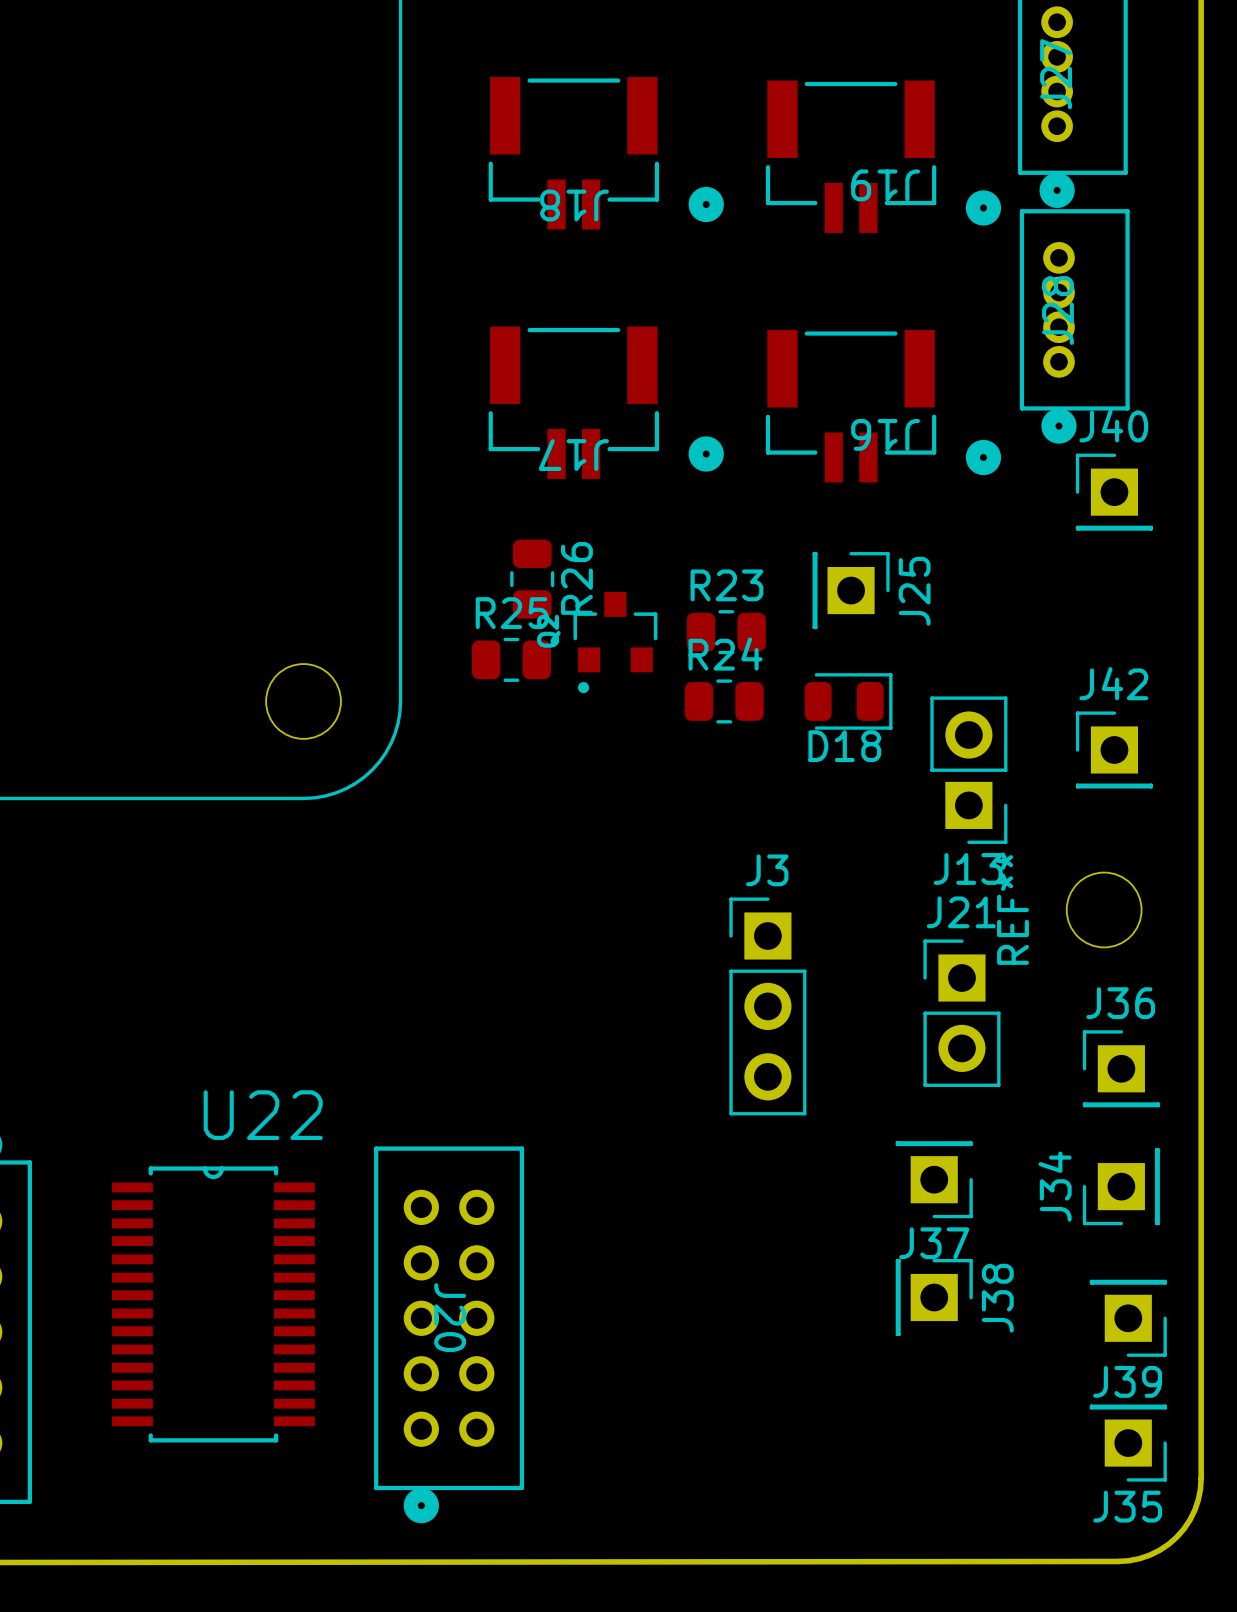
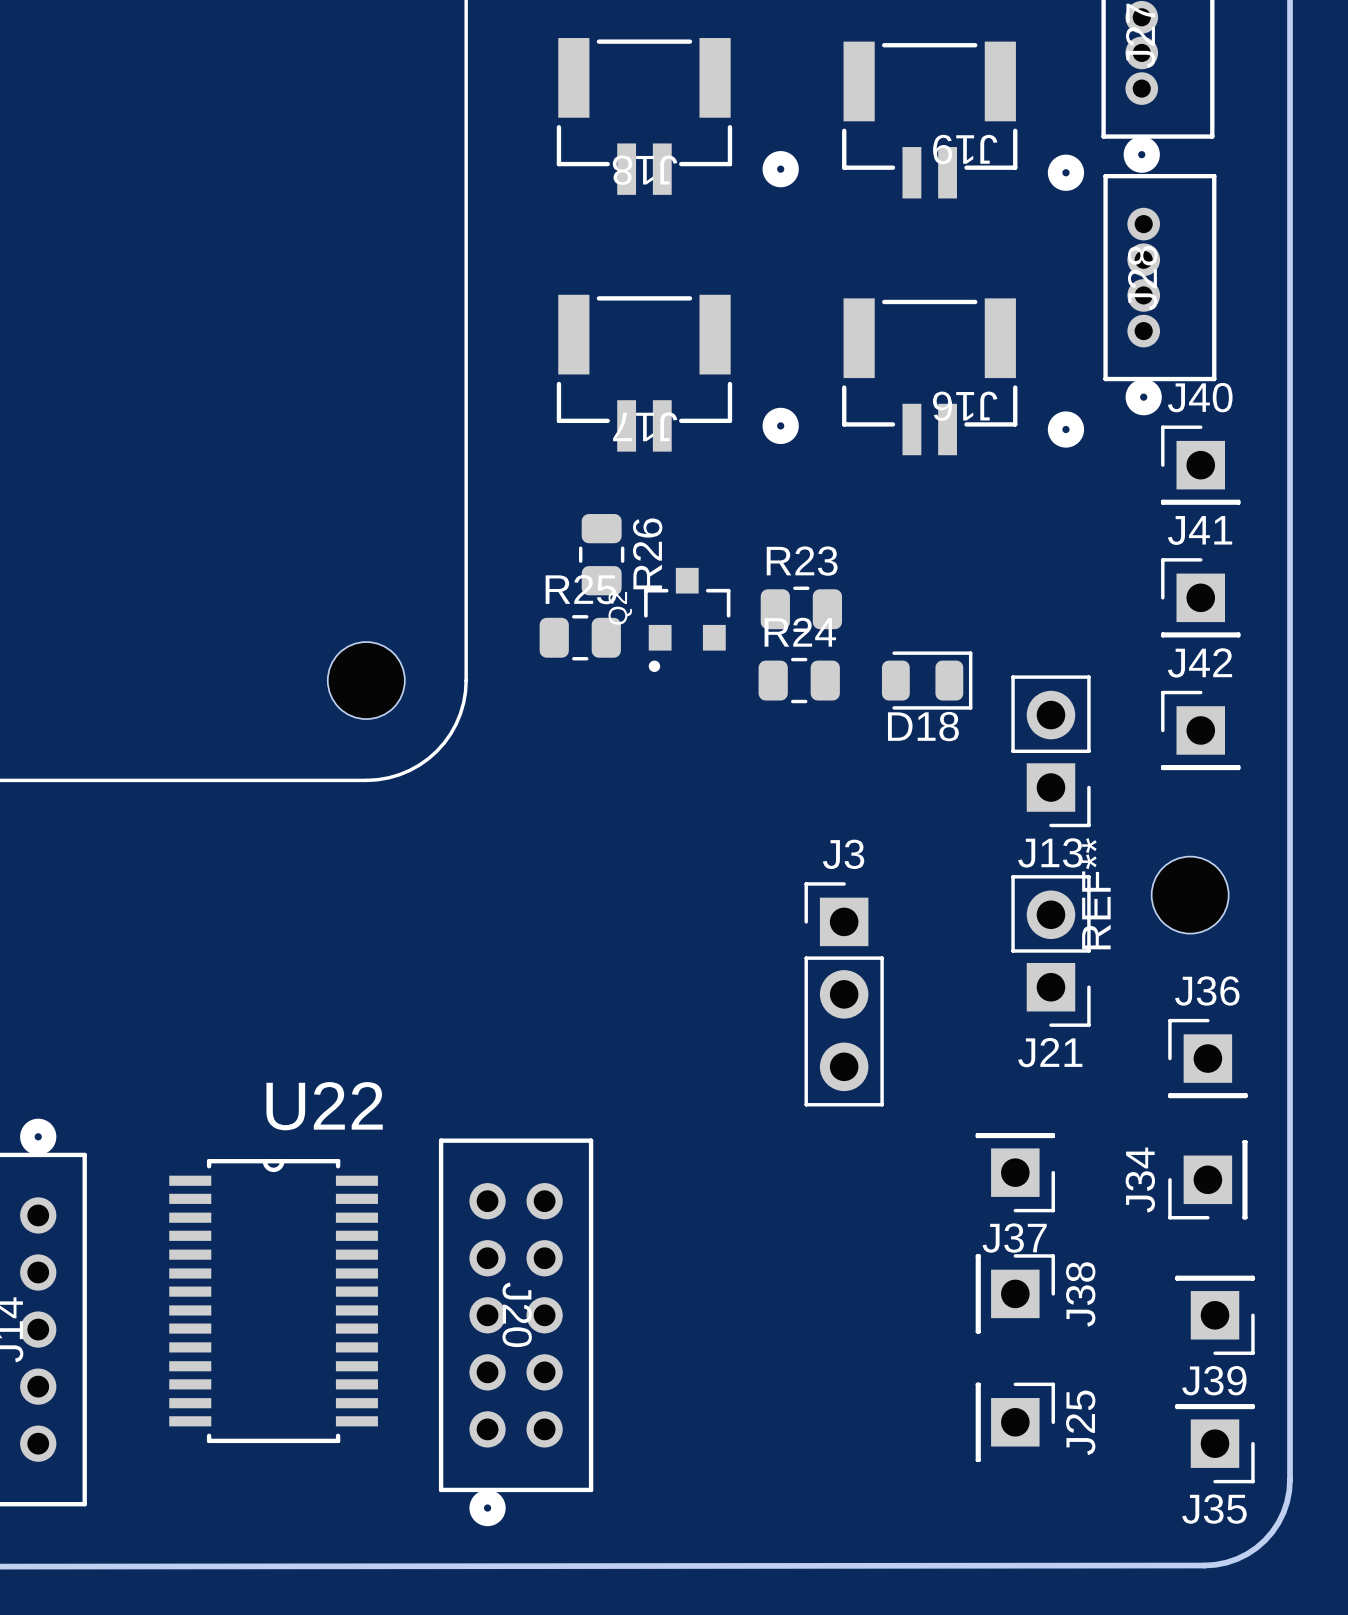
J25 position: (851, 590) -> (1015, 1422)
J41: none -> (1200, 597)
J21 rotation: 0° (961, 1013) -> 180° (1050, 951)

